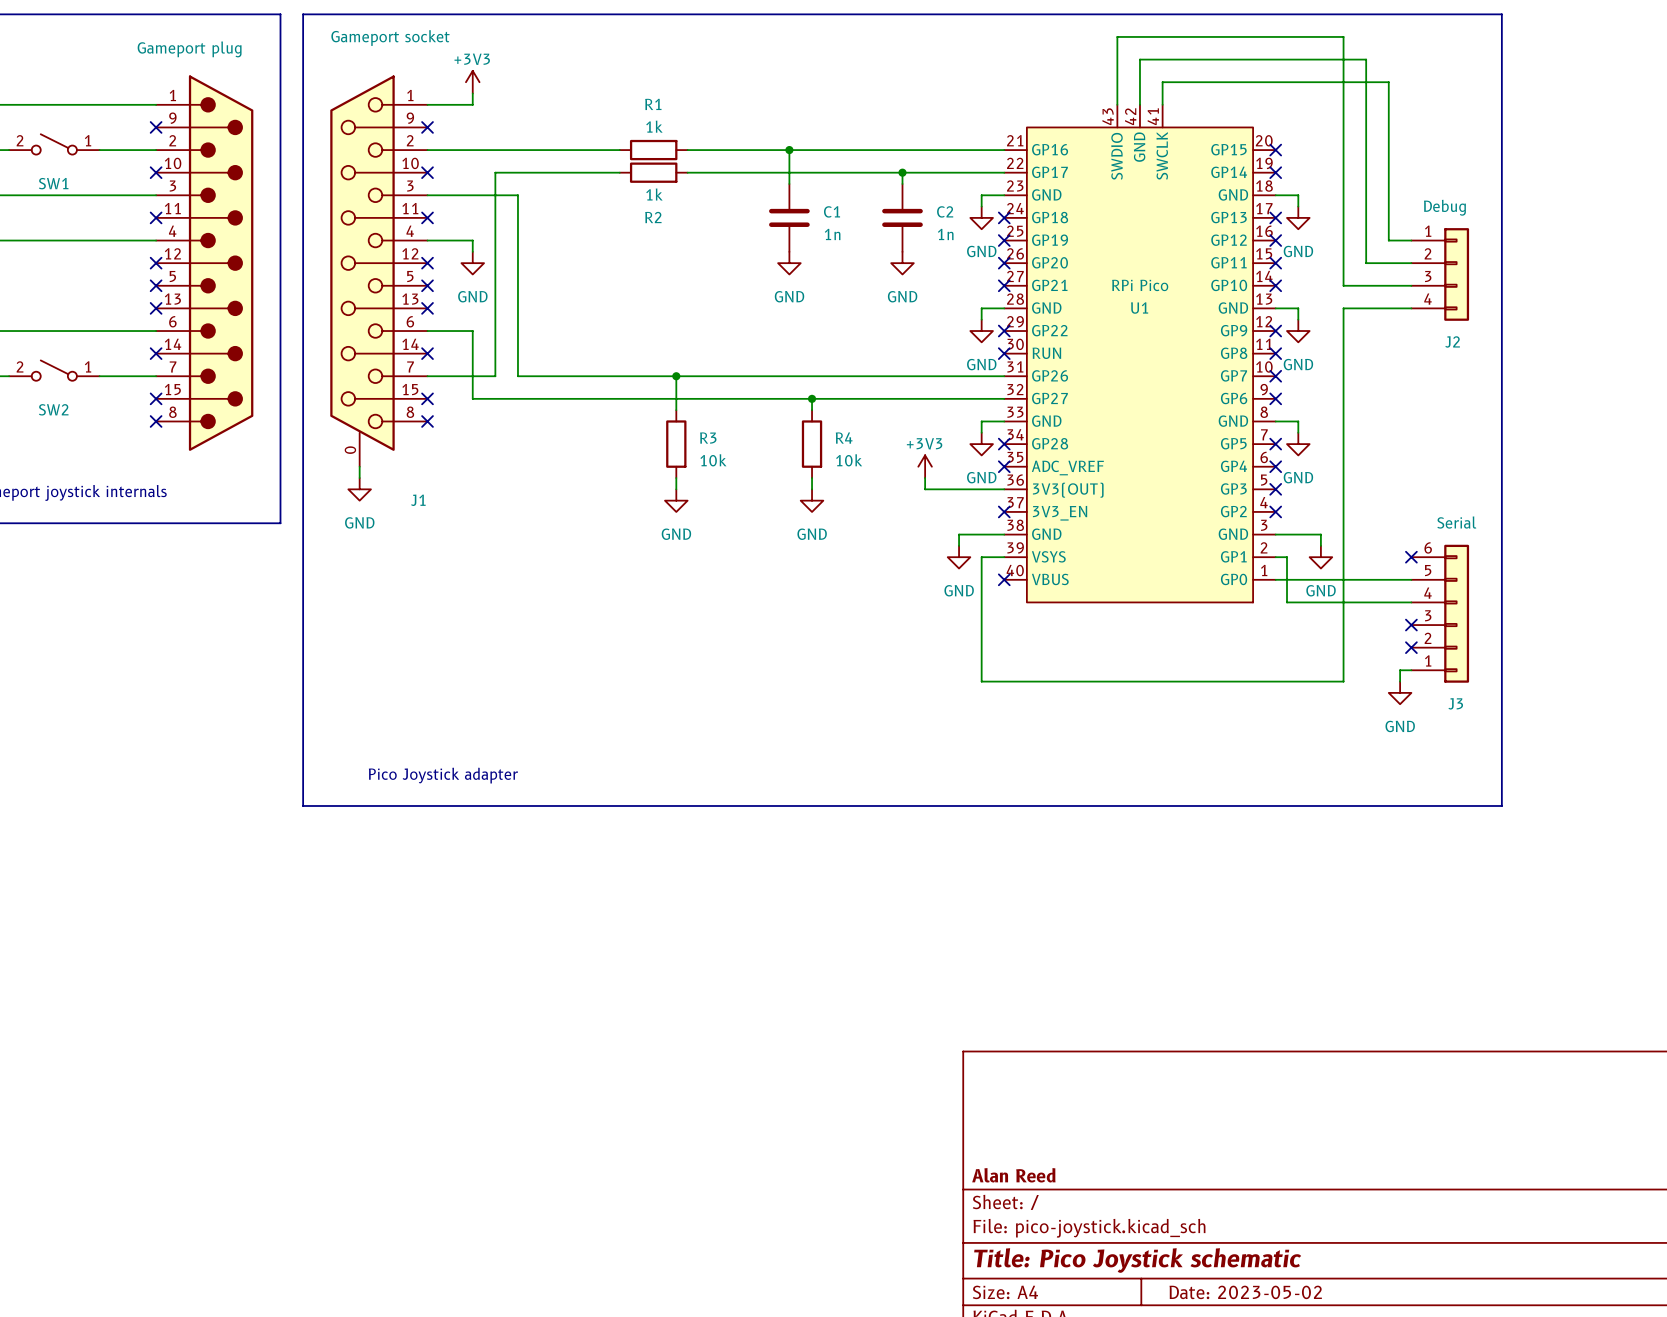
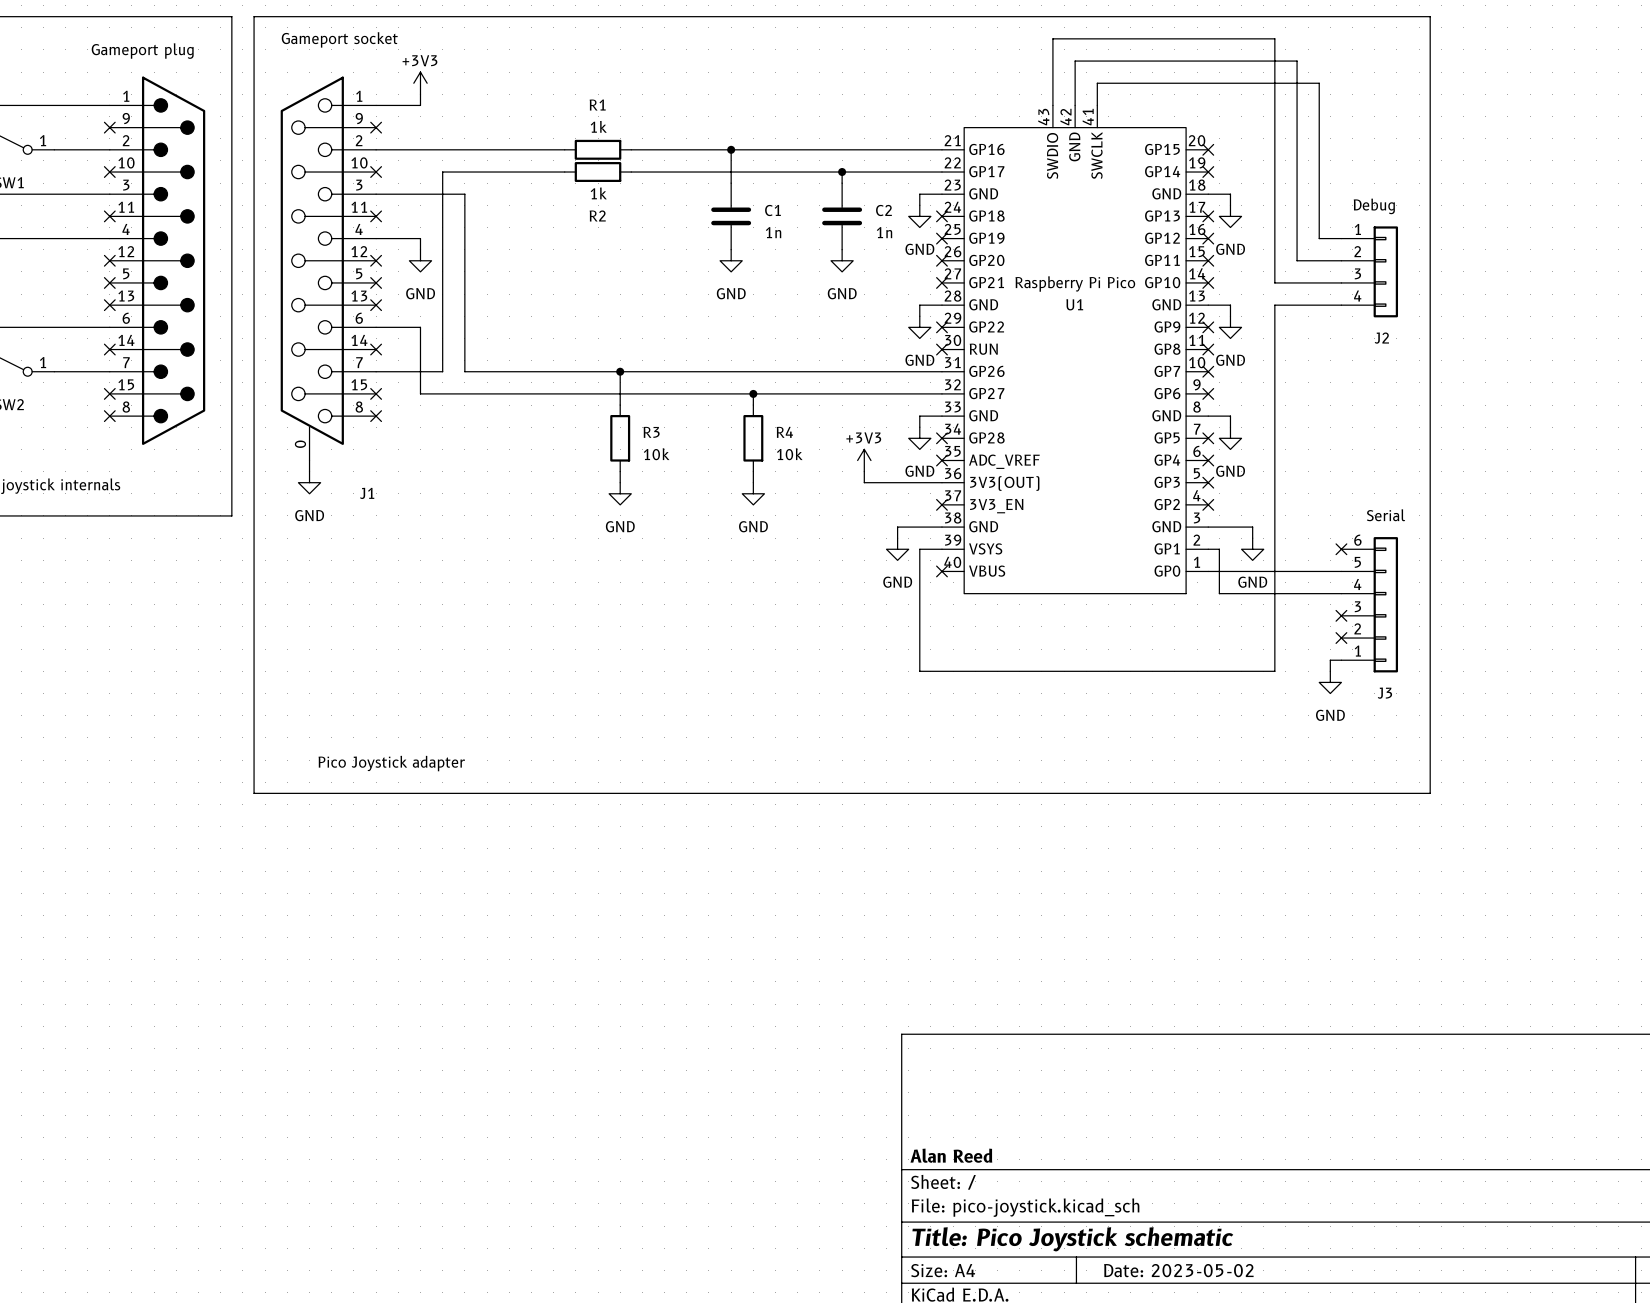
U1 value: RPi Pico (1140, 285) -> Raspberry Pi Pico (1075, 284)

